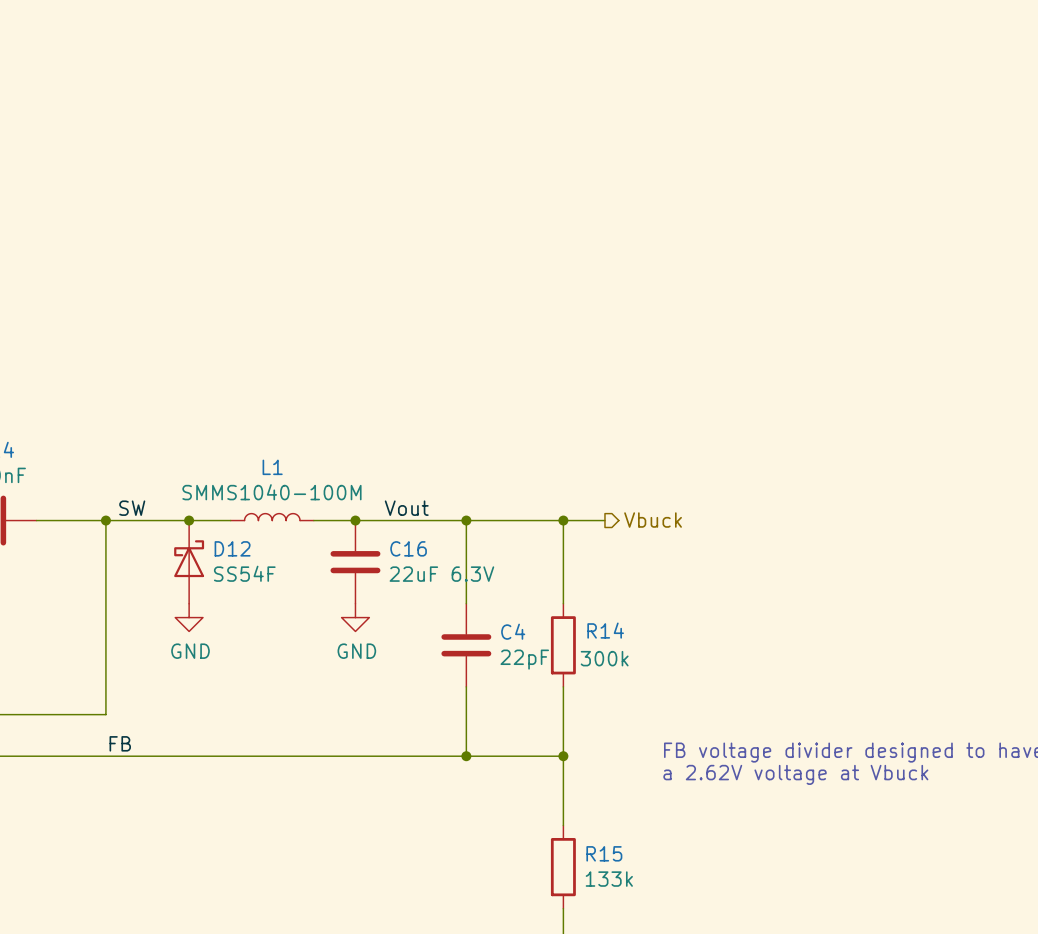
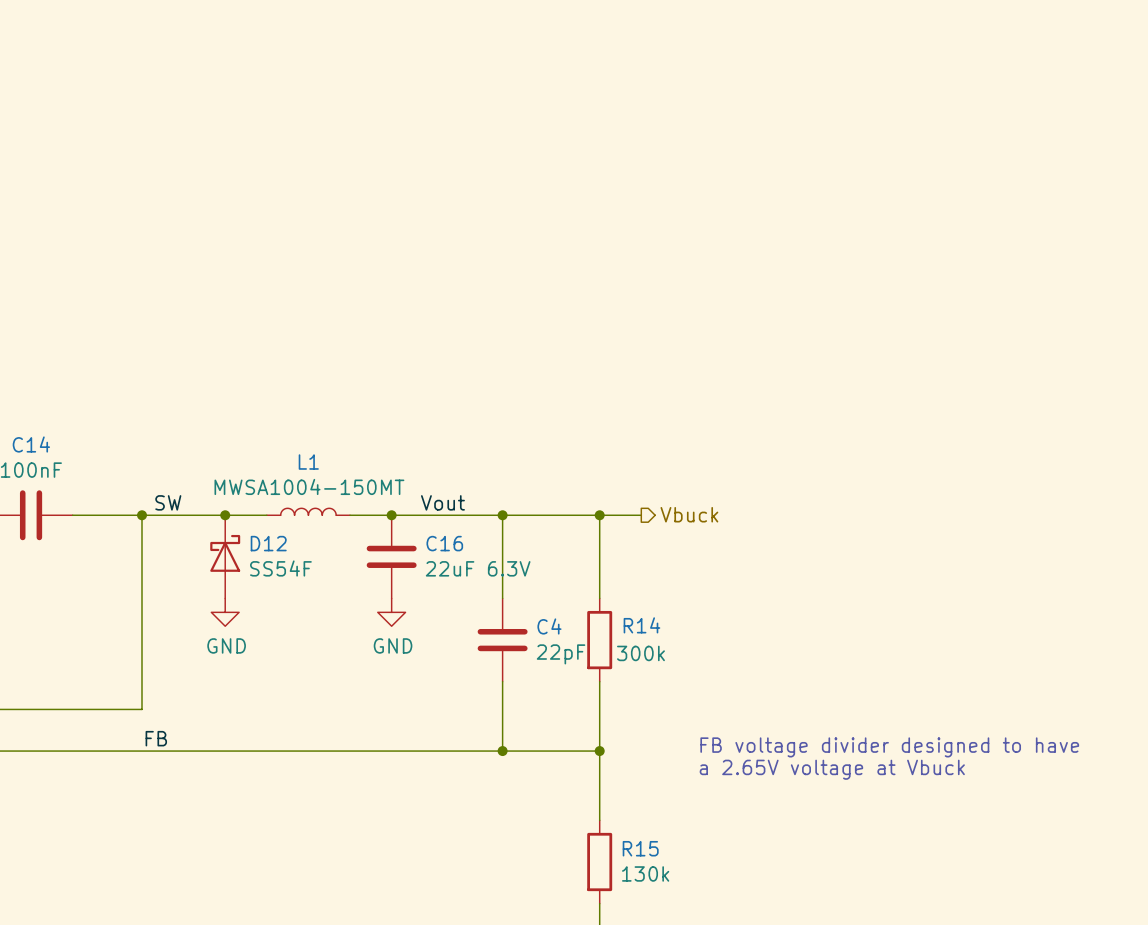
L1 value: SMMS1040-100M (271, 492) -> MWSA1004-150MT (309, 486)
text: a 2.62V voltage at Vbuck (795, 774) -> a 2.65V voltage at Vbuck (832, 769)
R15 value: 133k (609, 879) -> 130k (645, 873)

